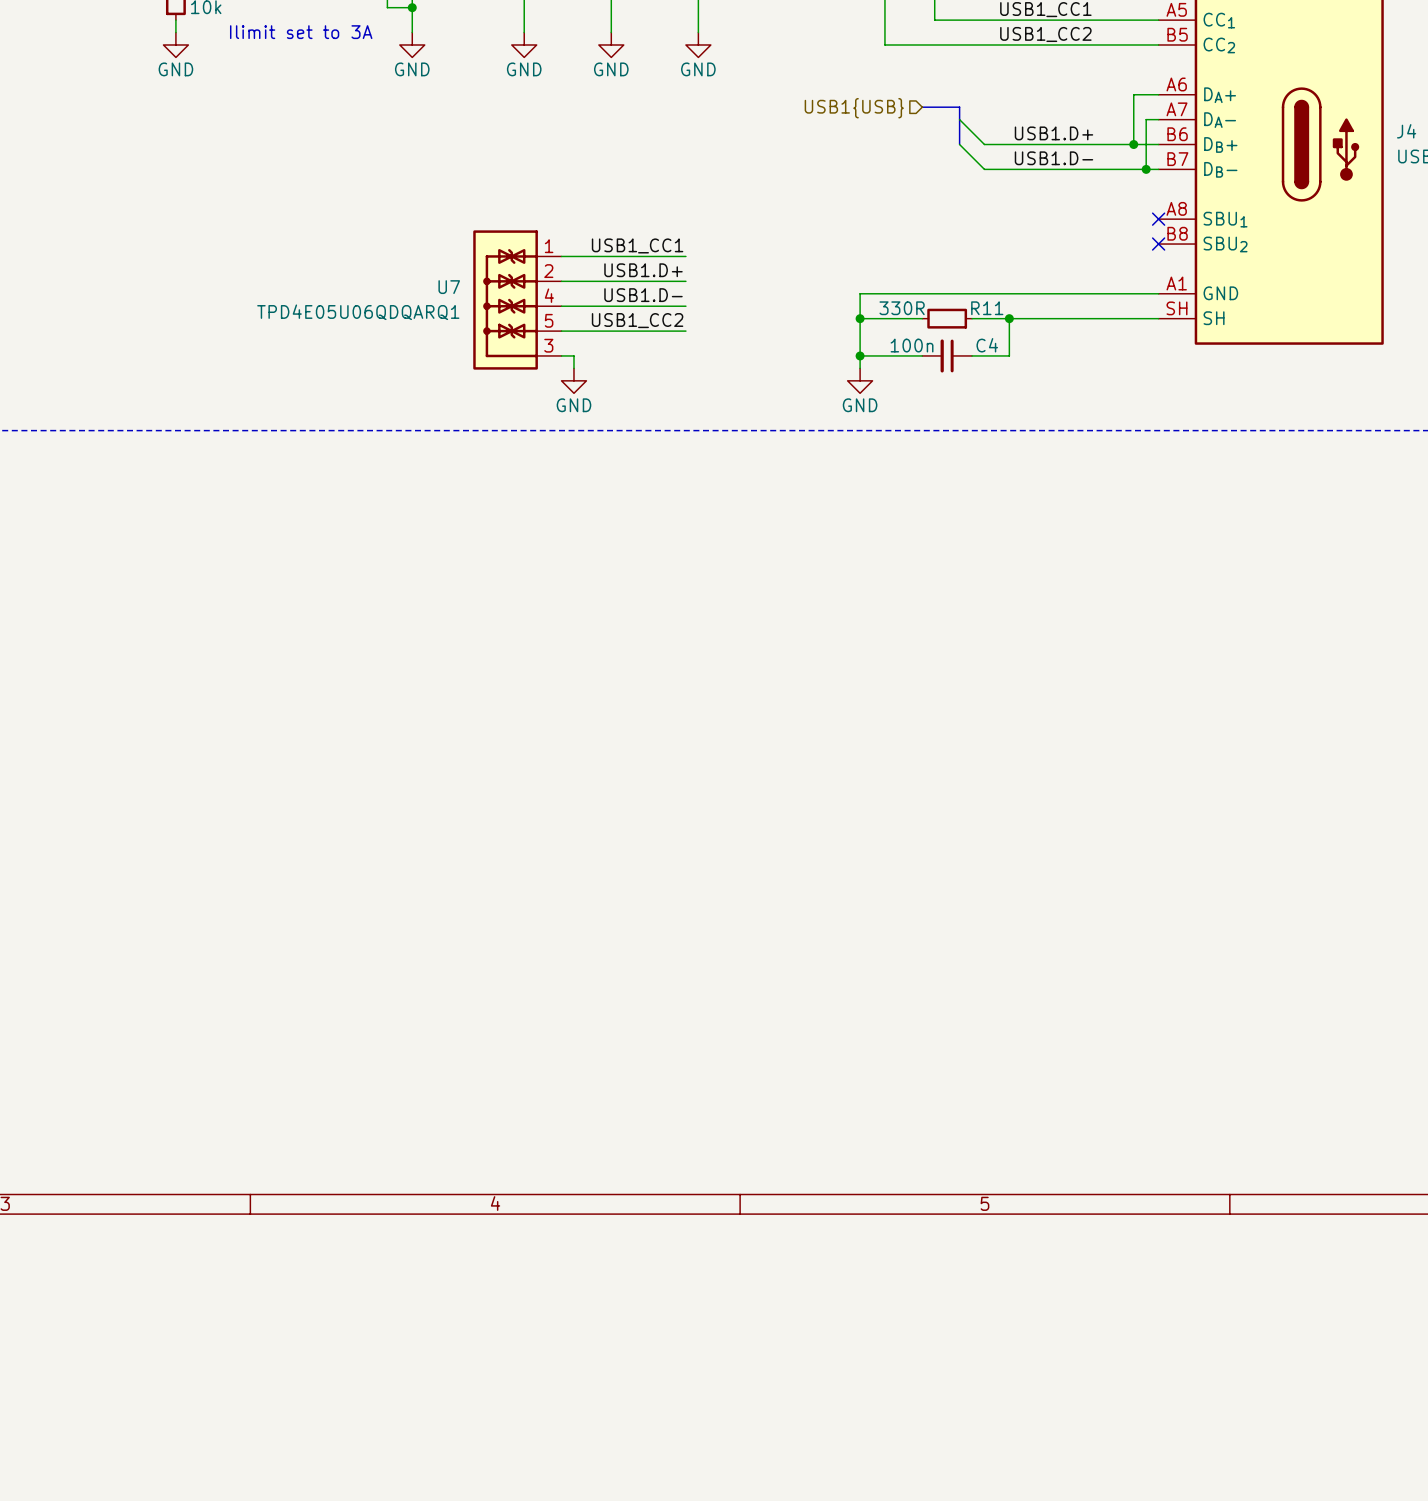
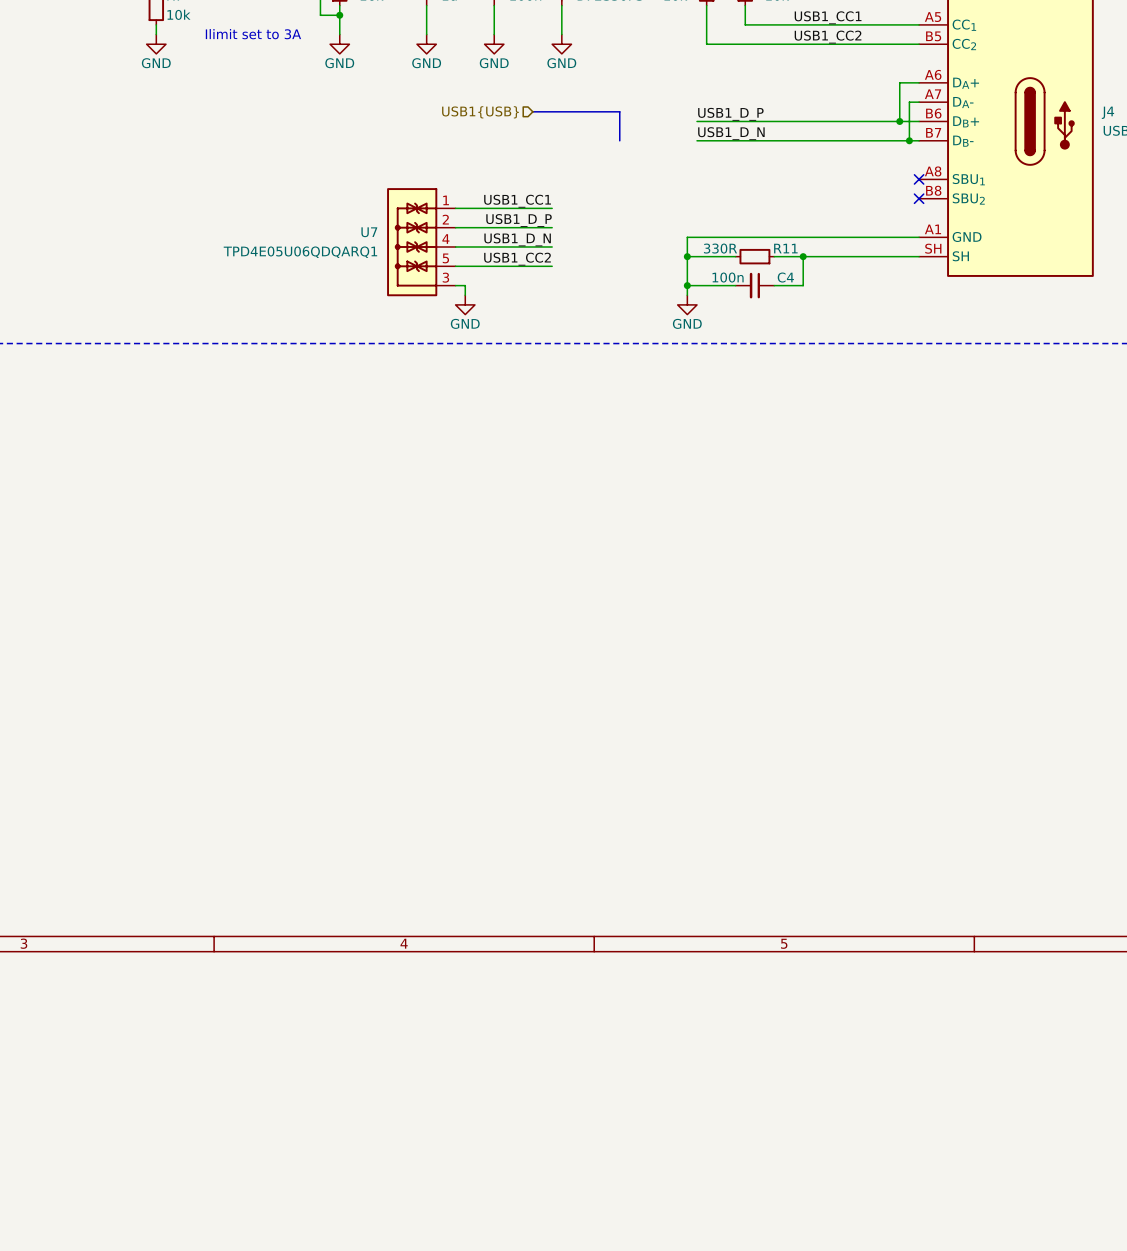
bus: (922, 107) (959, 107) (959, 144) -> none
hierarchical label: USB1{USB} (854, 108) -> none
wire: (959, 119) (984, 144) -> (697, 121) (783, 121)
bus: none -> (532, 111) (619, 111) (619, 140)
hierarchical label: none -> USB1{USB} (480, 112)
label: USB1.D+ (1053, 133) -> none
label: none -> USB1_D_P (730, 114)
wire: (959, 144) (984, 169) -> (697, 140) (783, 140)
label: none -> USB1_D_N (731, 133)
label: USB1.D- (1053, 158) -> none
label: USB1.D+ (643, 270) -> USB1_D_P (519, 220)
label: USB1.D- (643, 295) -> USB1_D_N (517, 239)

